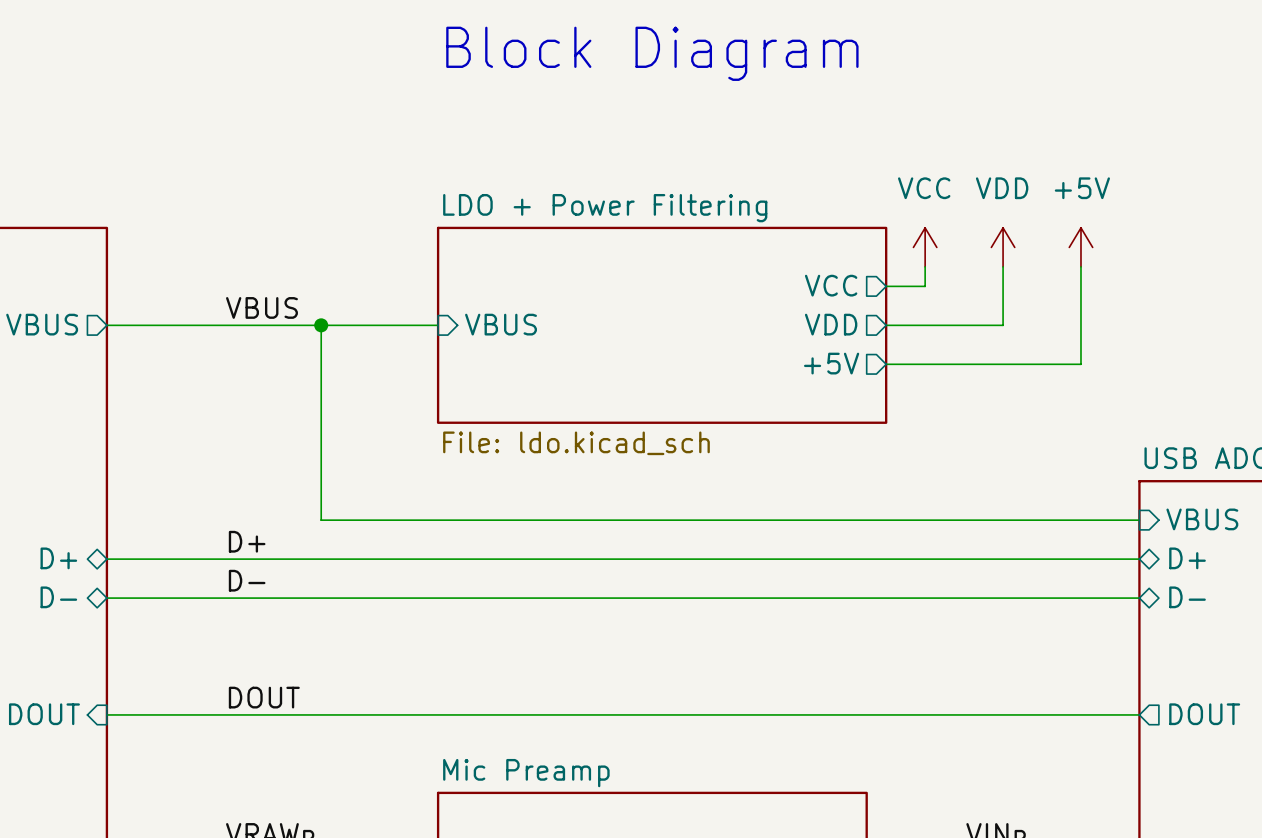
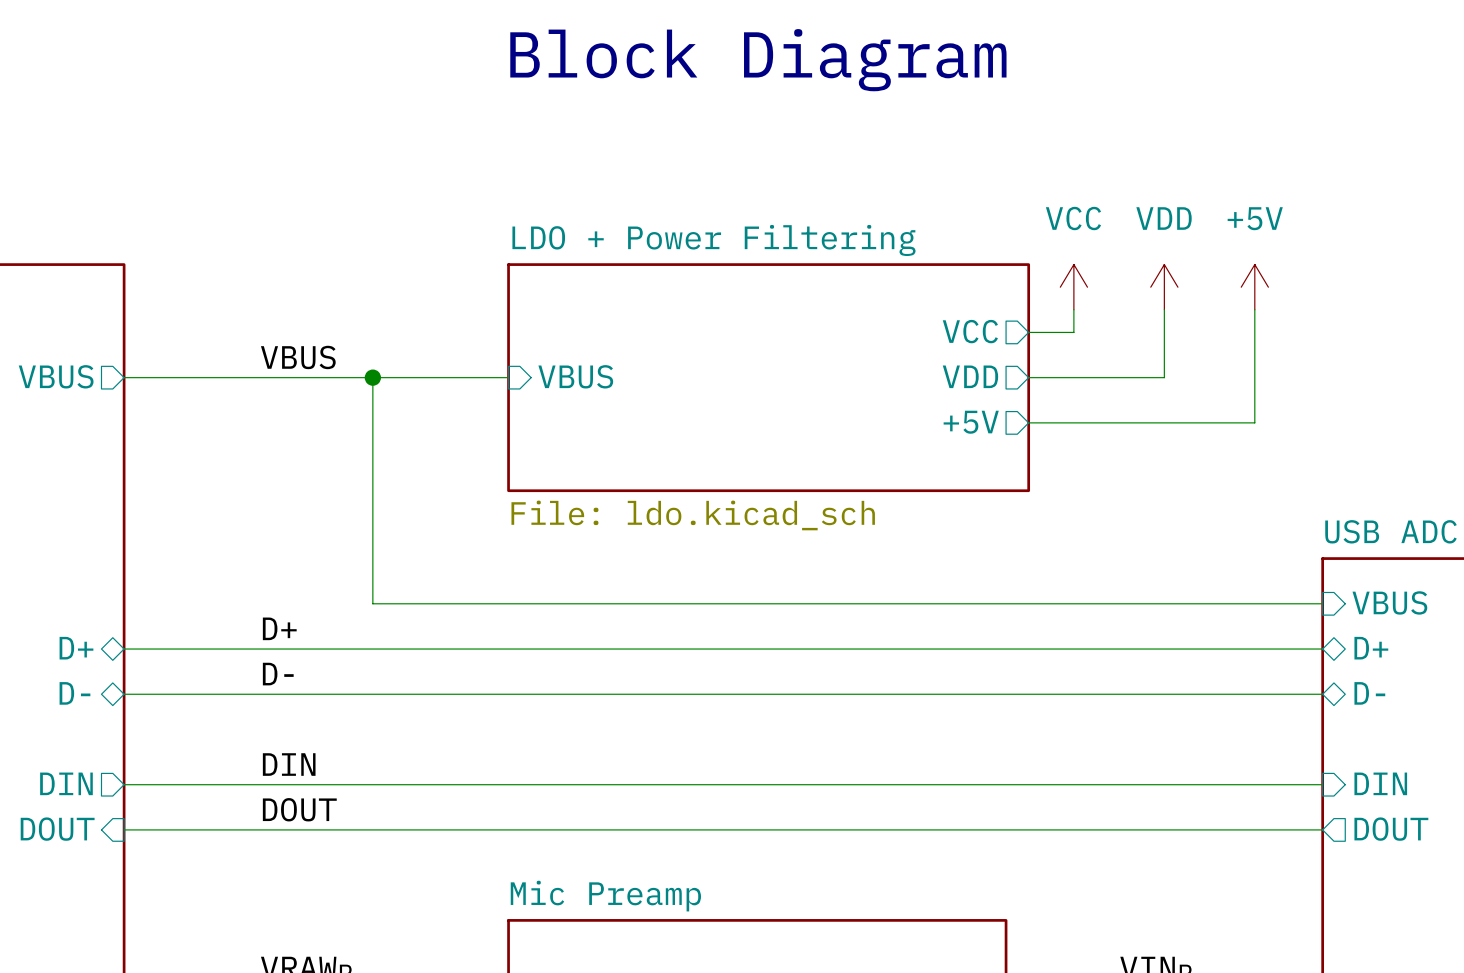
label: none -> DIN (289, 764)
sheet pin: none -> DIN (66, 783)
sheet pin: none -> DIN (1380, 783)
wire: none -> (124, 784) (1322, 784)

